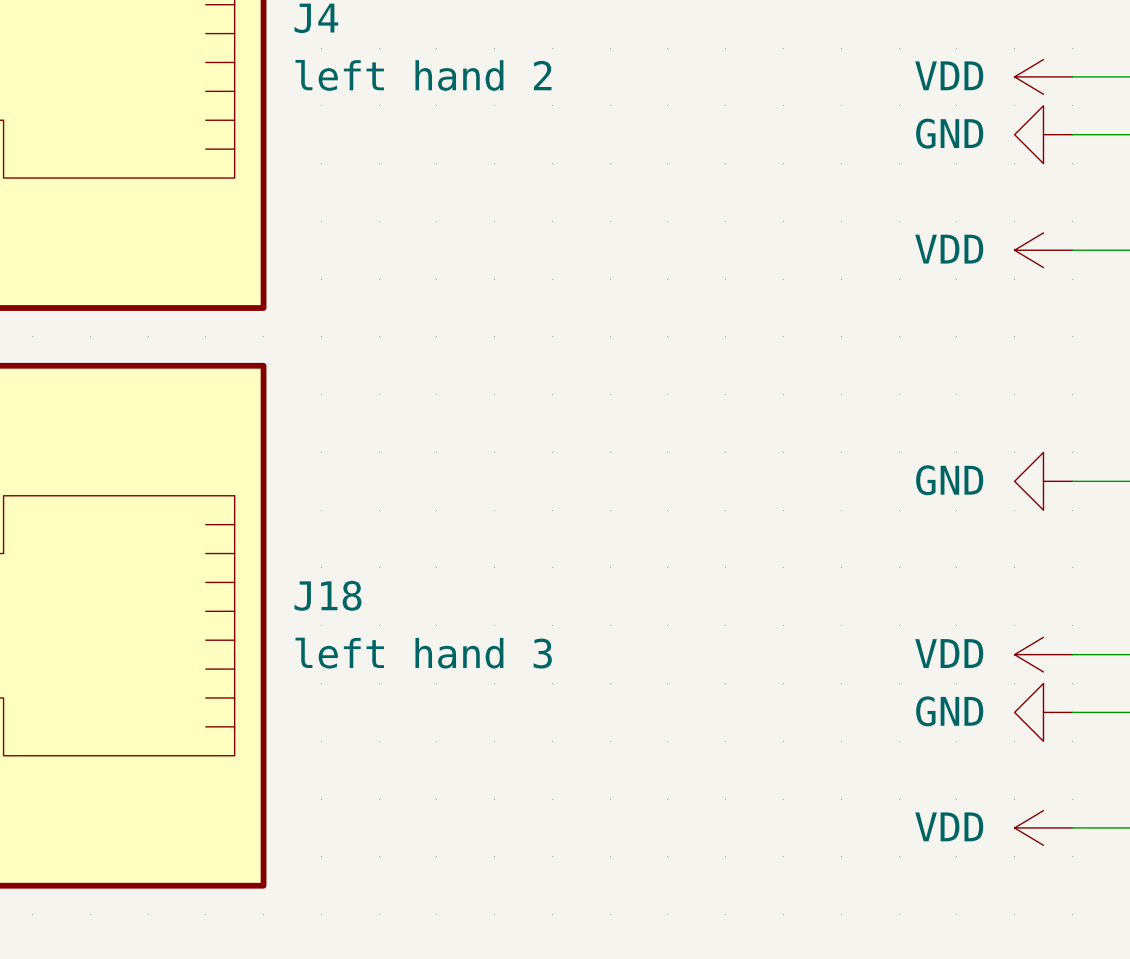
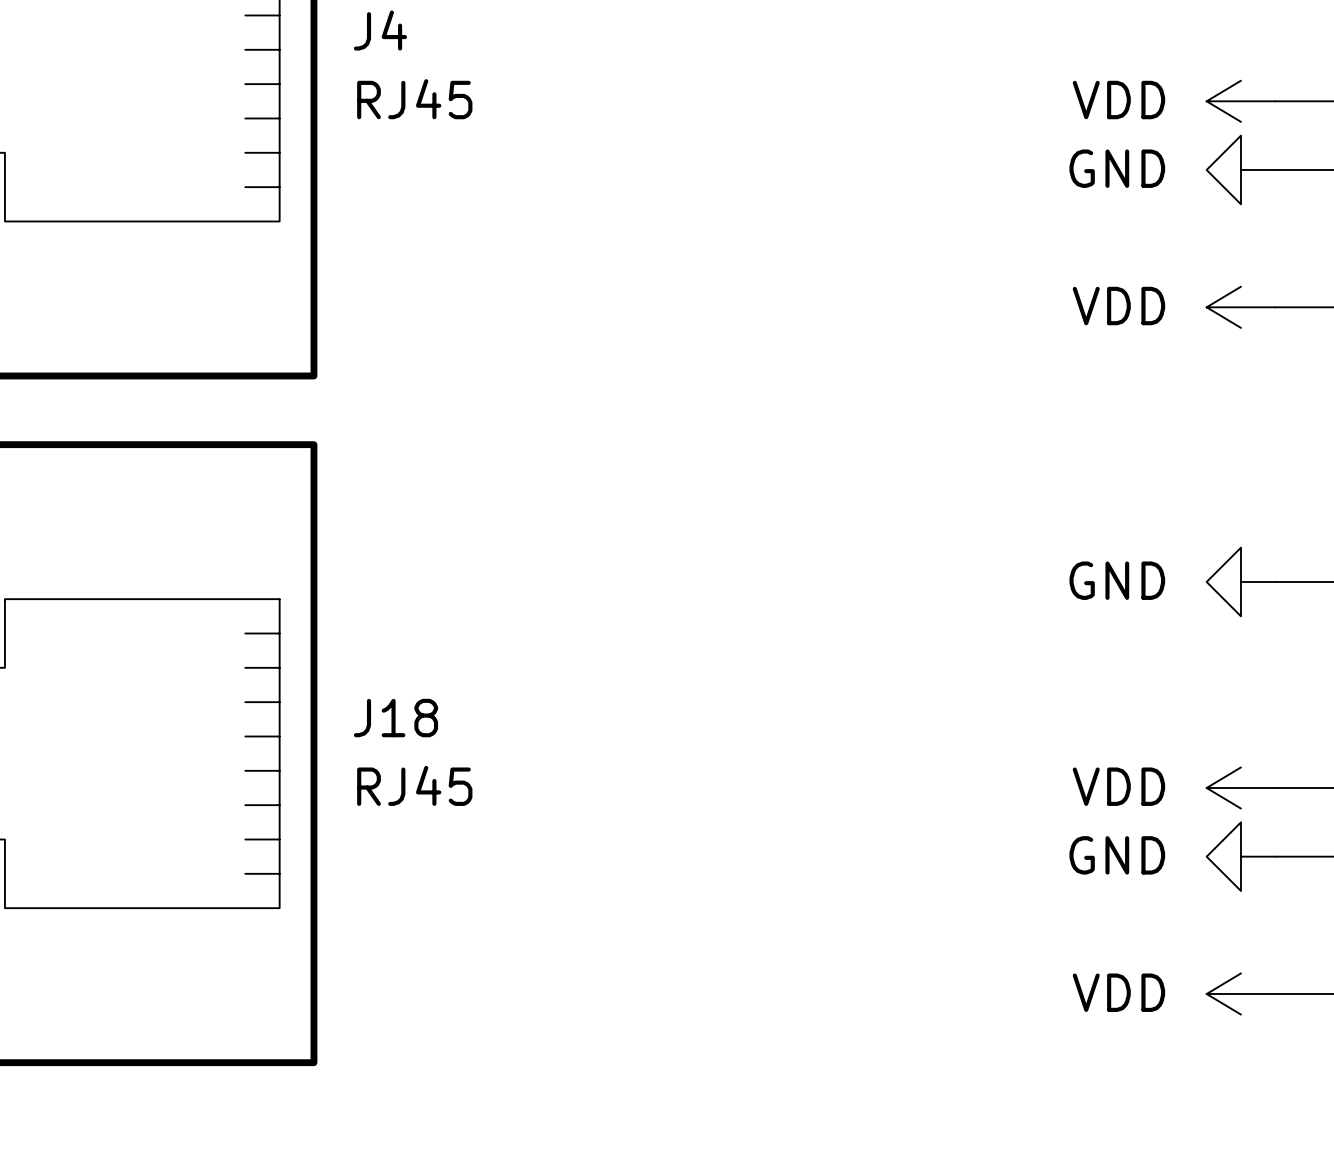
J4 value: left hand 2 (423, 75) -> RJ45 (414, 99)
J18 value: left hand 3 (423, 653) -> RJ45 (414, 785)

